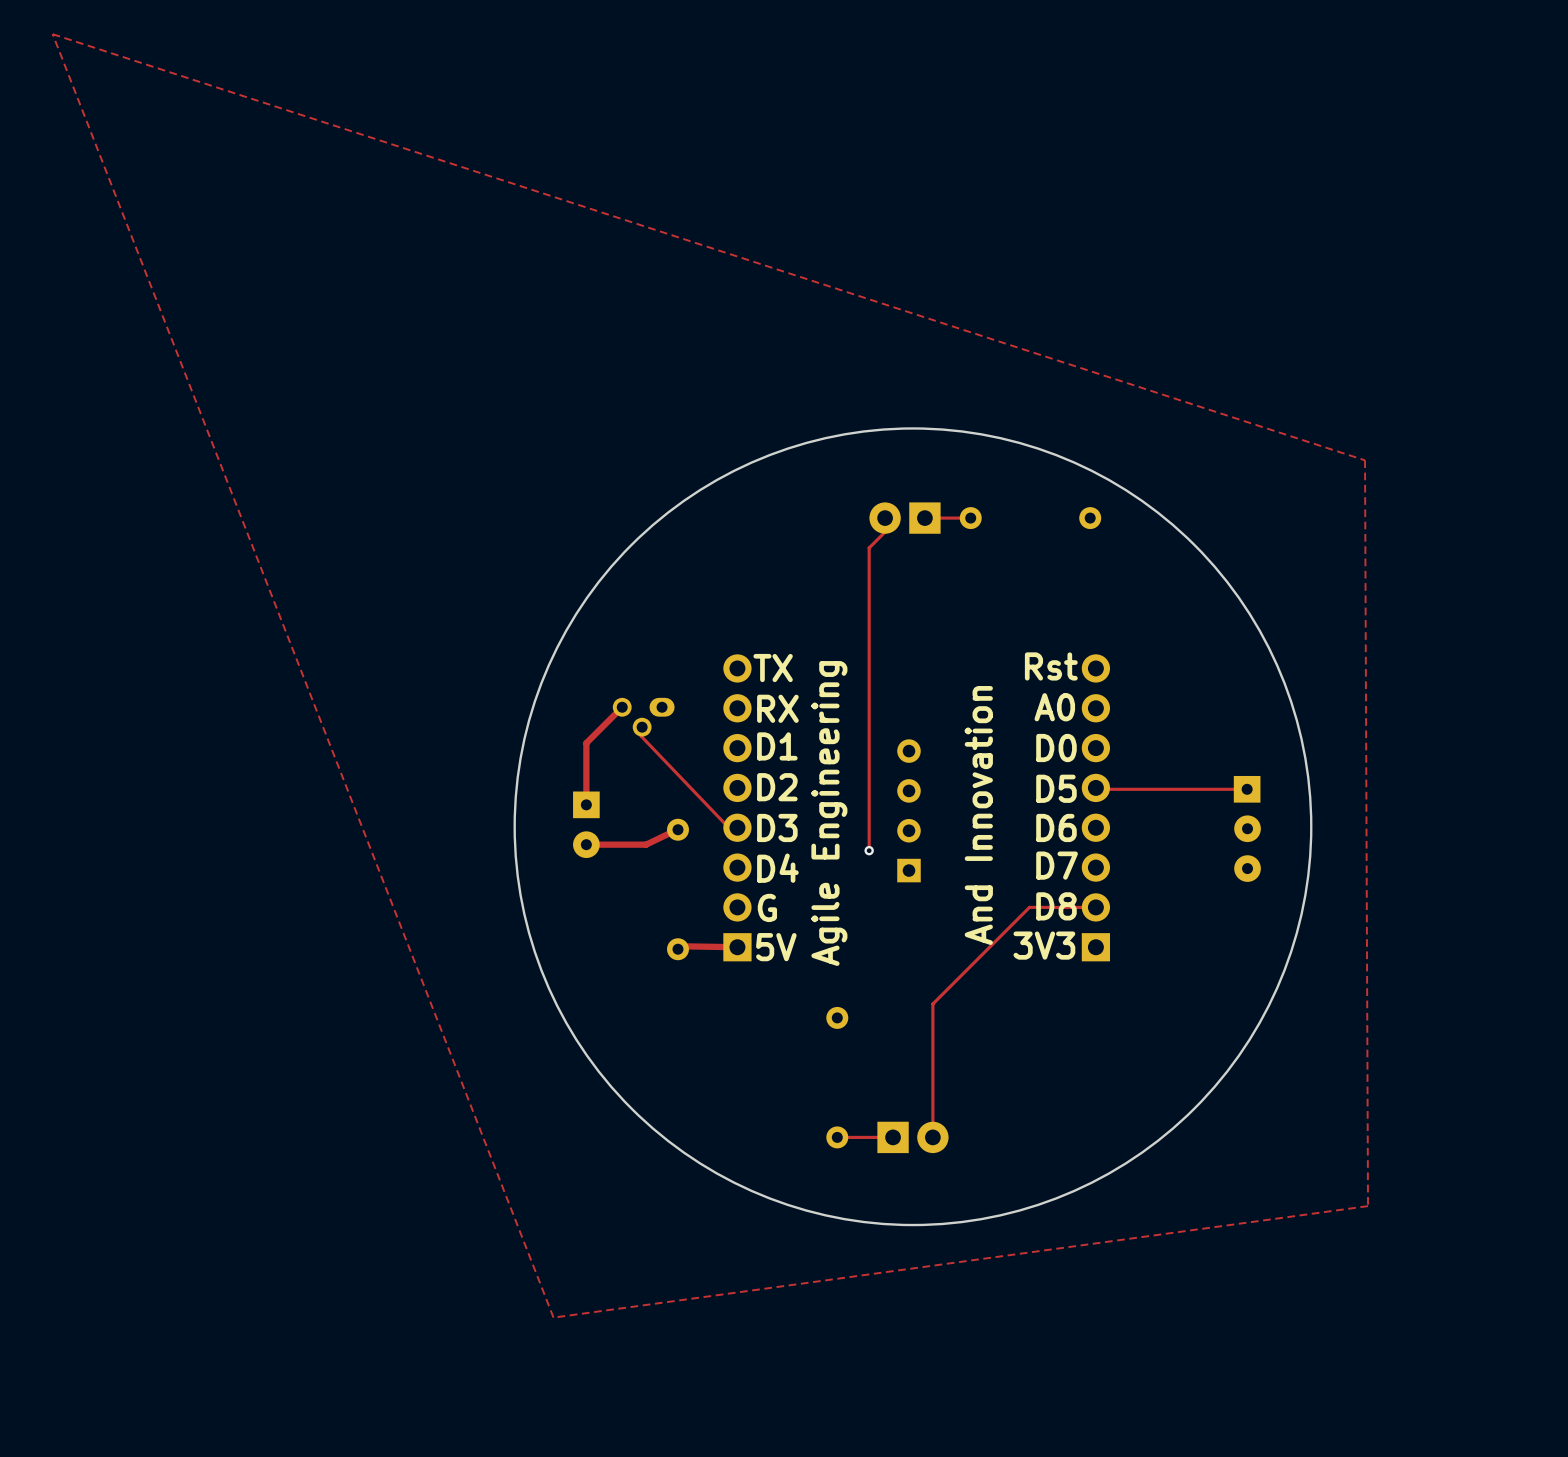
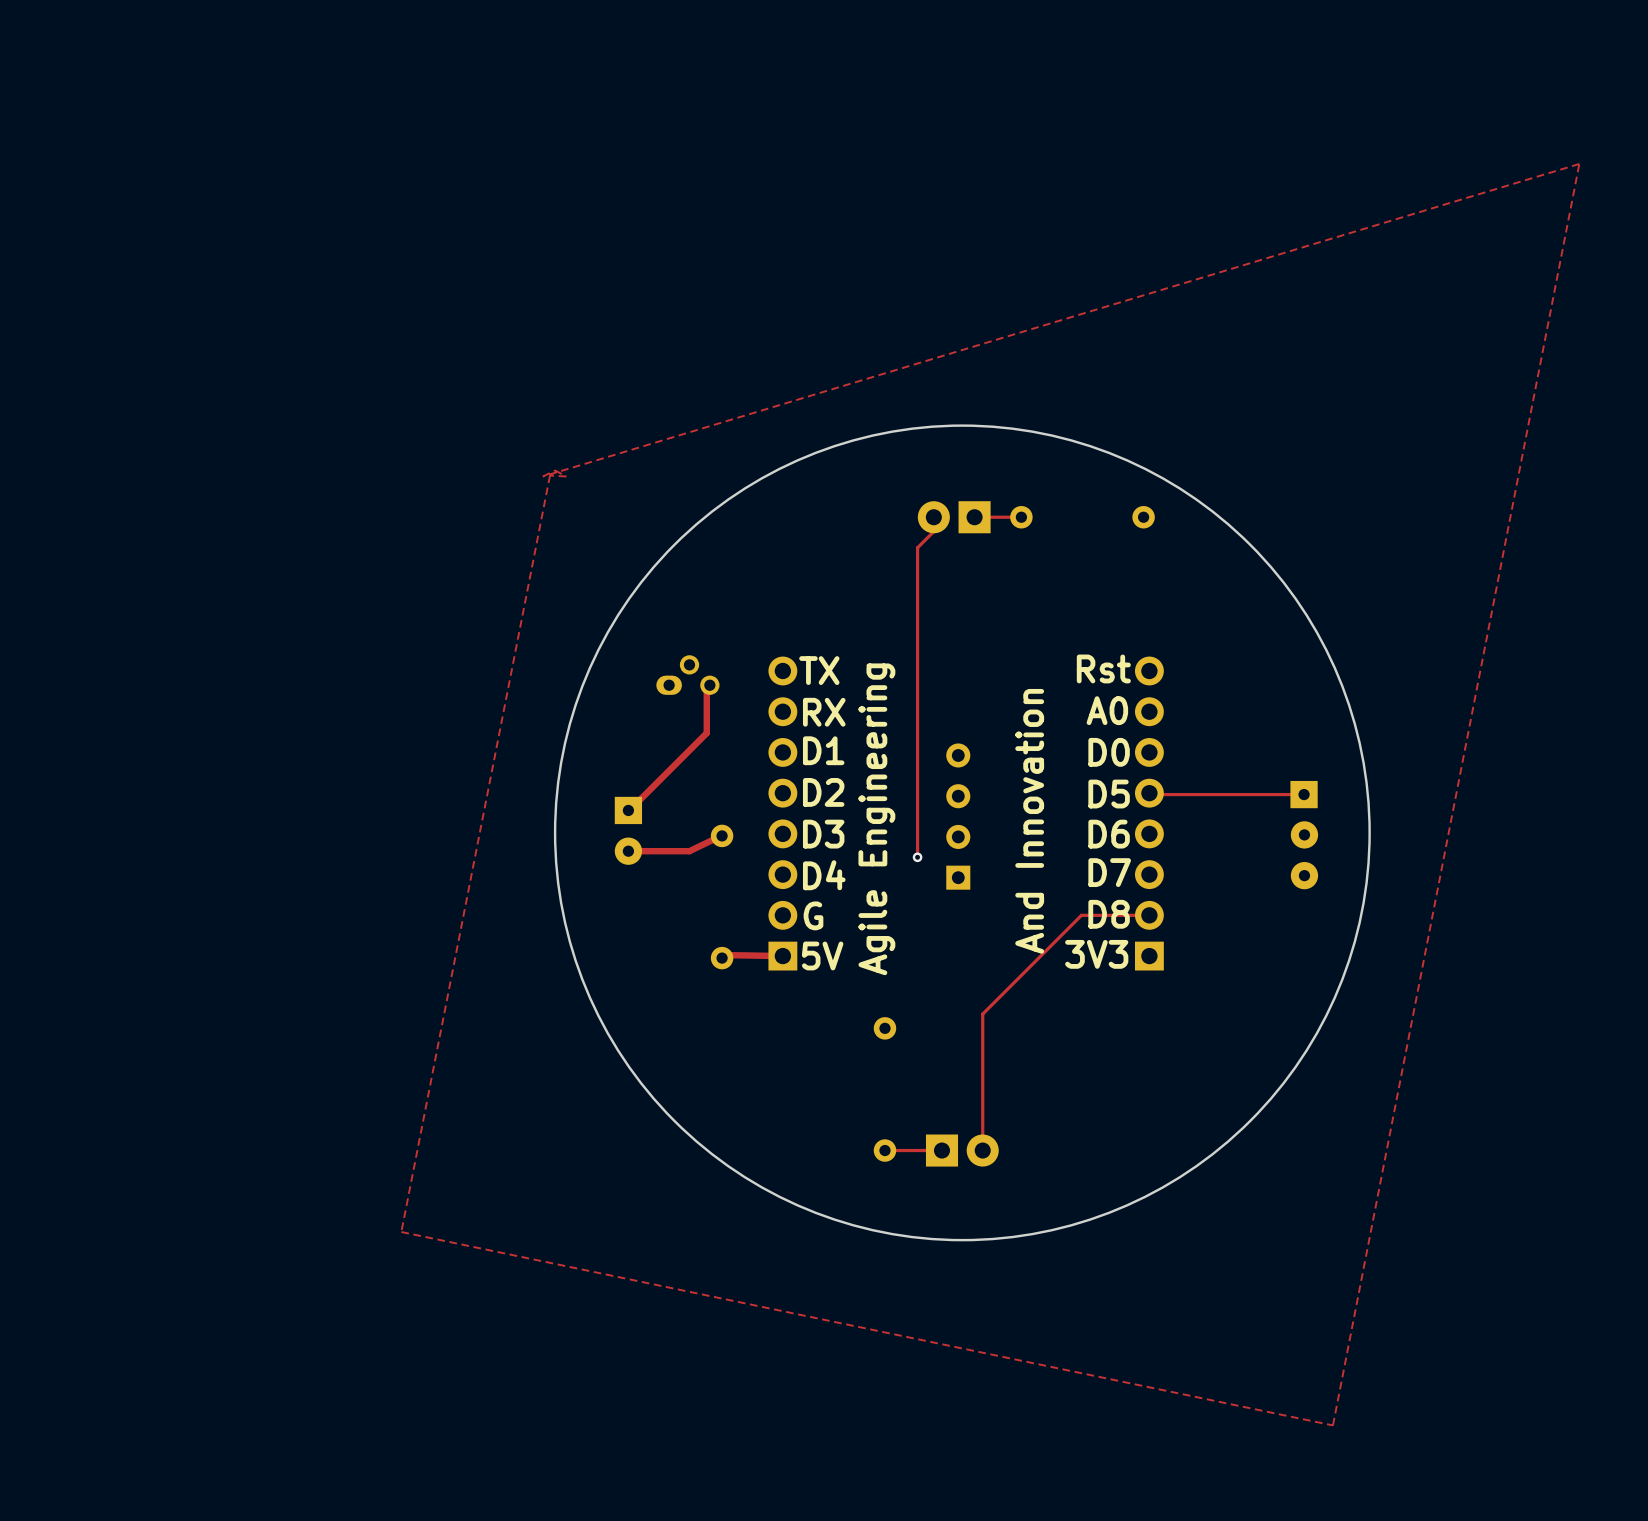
zone outline: (52, 34) (553, 1317) (1368, 1206) (1365, 460) (52, 34) -> (1579, 163) (542, 476) (555, 470) (566, 476) (550, 475) (401, 1231) (1332, 1425) (1579, 163)
track: (622, 707) (586, 743) (586, 804) -> (706, 684) (706, 733) (628, 810)
part rotation: 0° (643, 717) -> 180° (687, 675)
part position: (643, 717) -> (687, 675)
track: (642, 727) (641, 736) (728, 827) -> none

